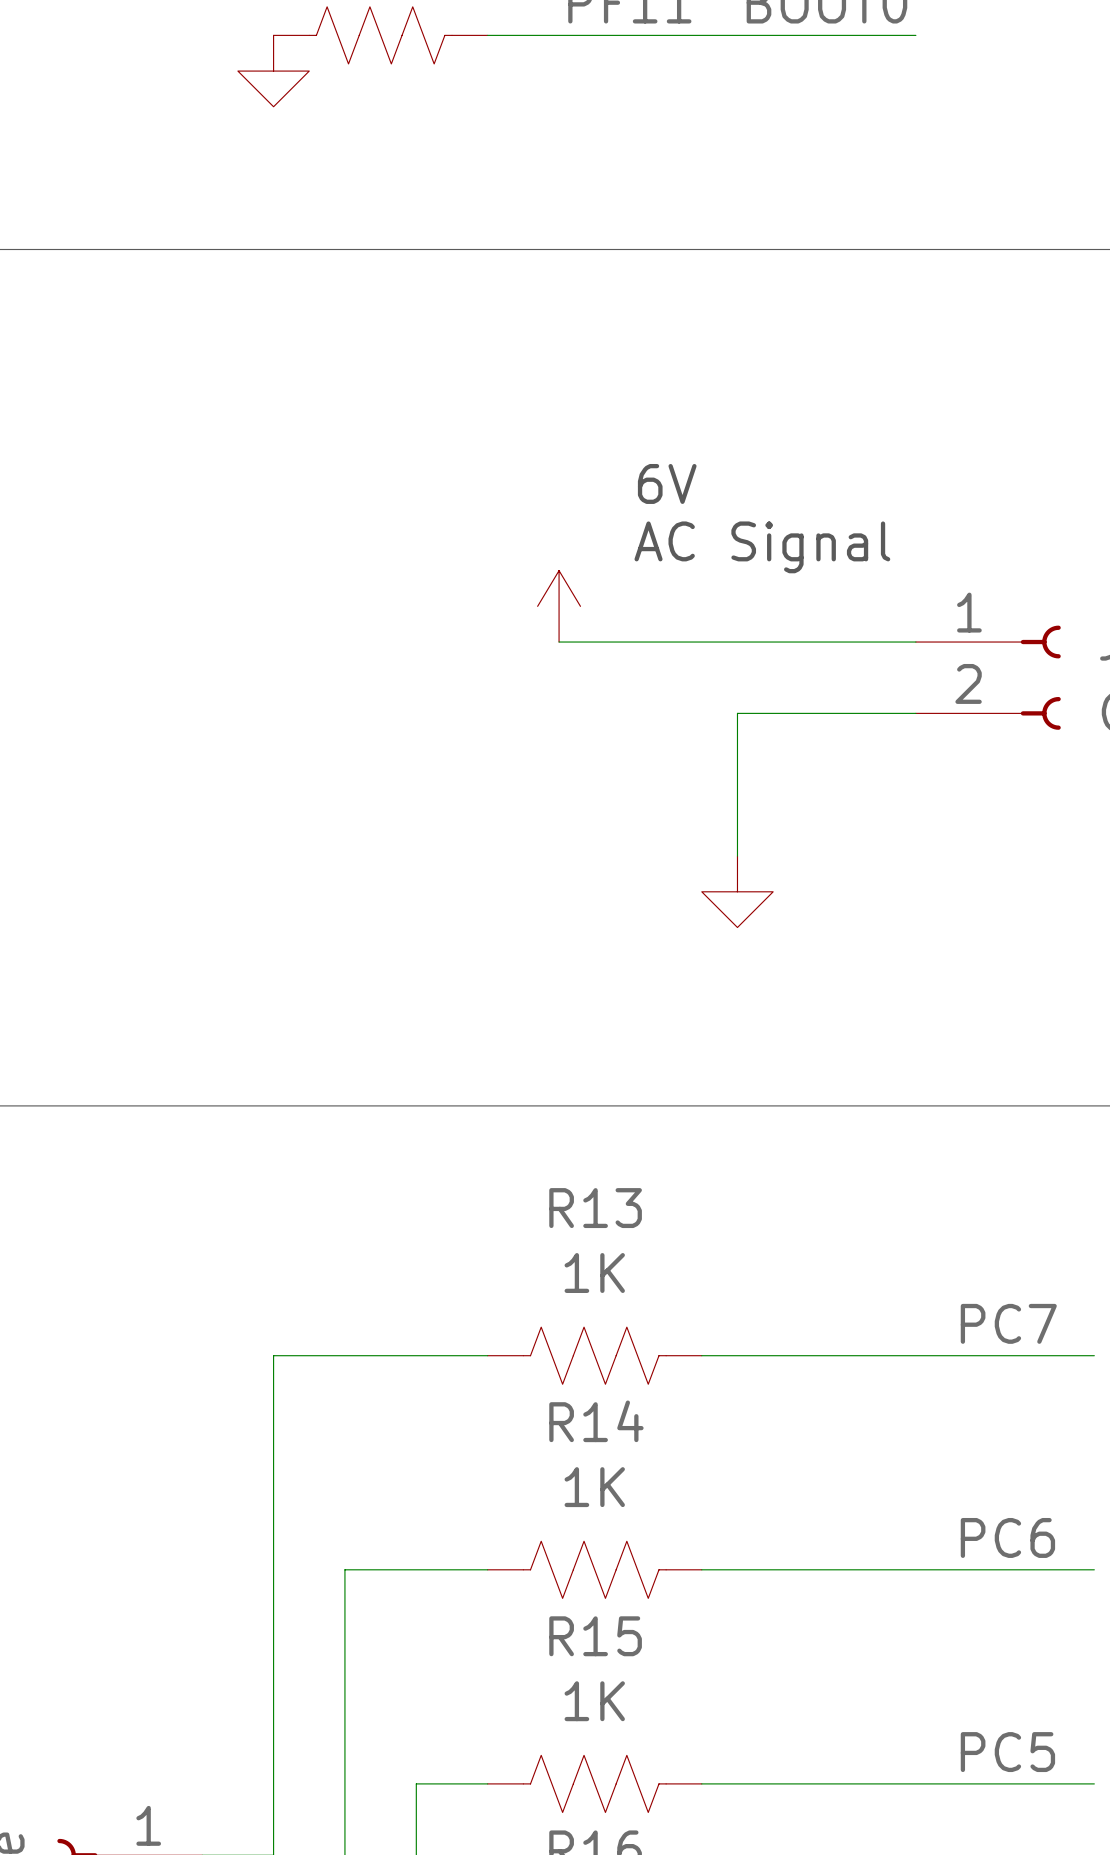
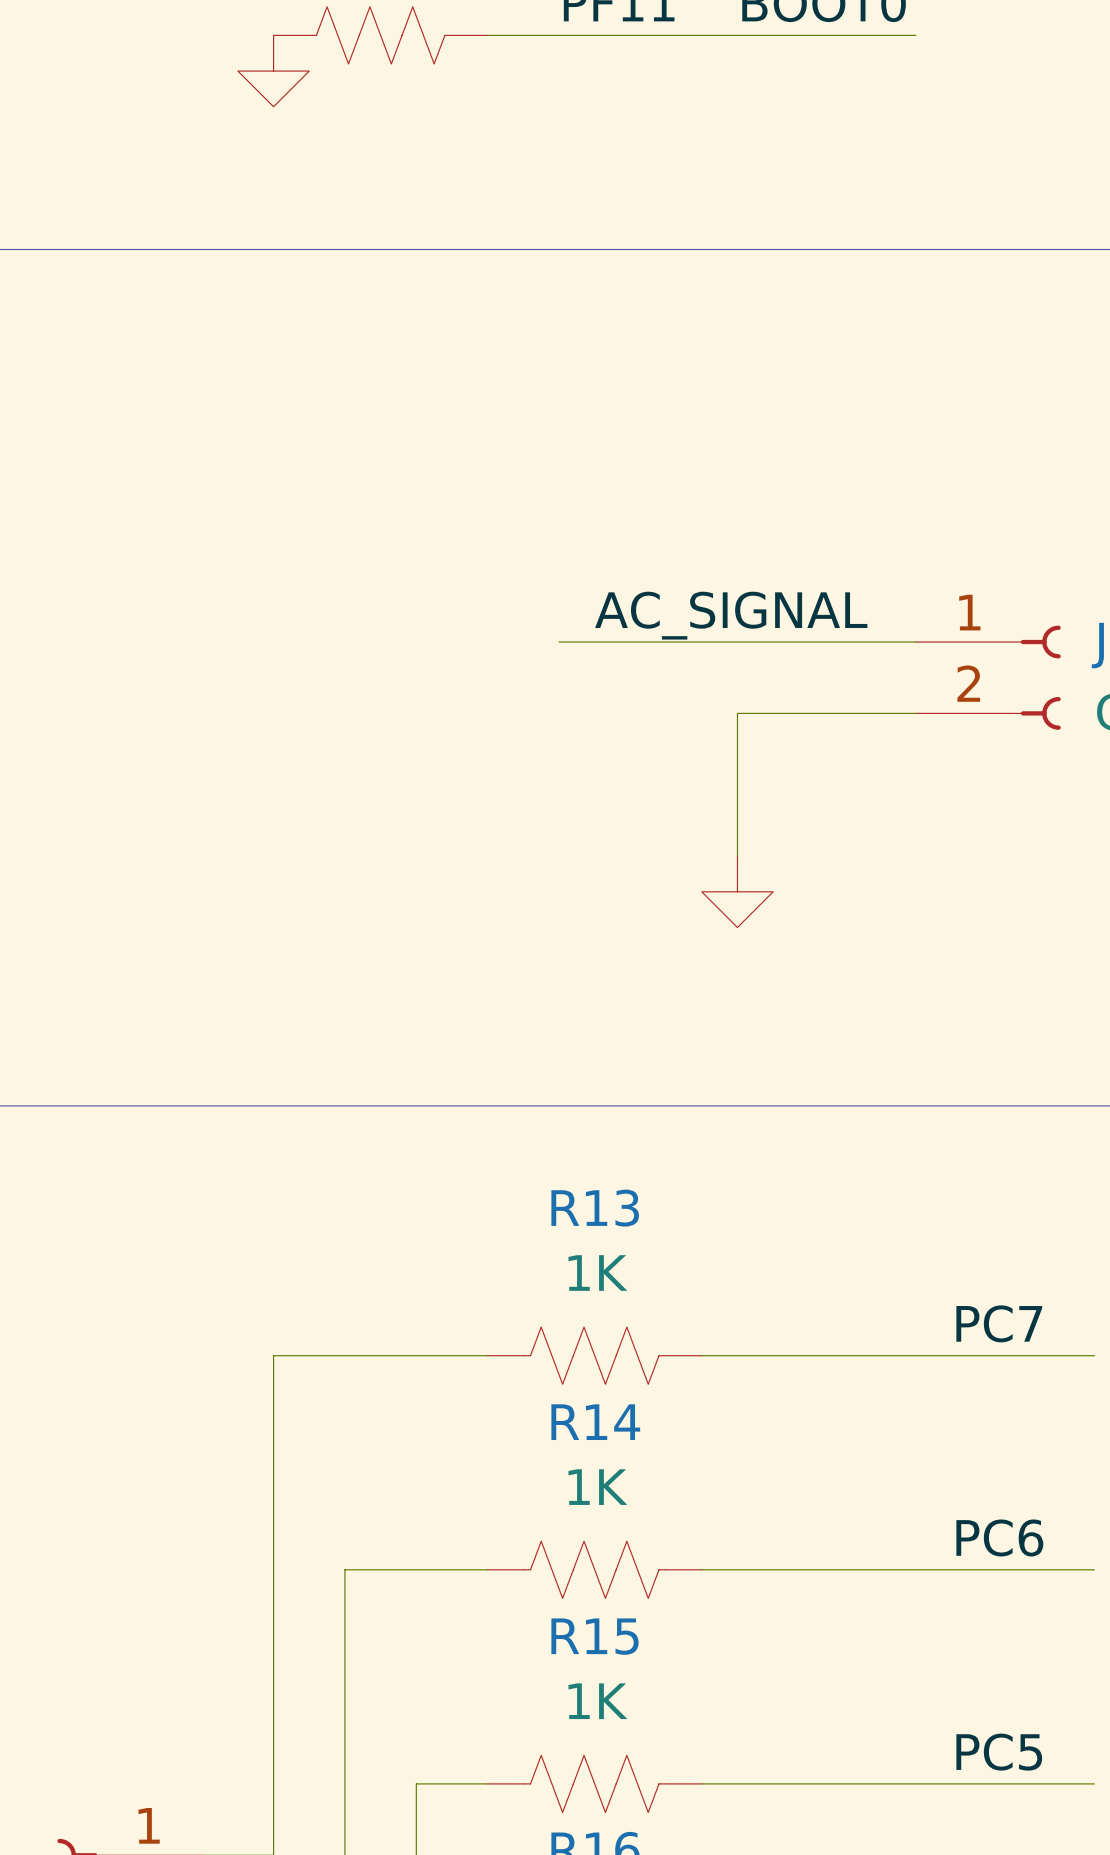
text: 6V (667, 483) -> none
text: AC Signal (762, 547) -> none
power symbol: (559, 606) -> none
label: none -> AC_SIGNAL (731, 615)

